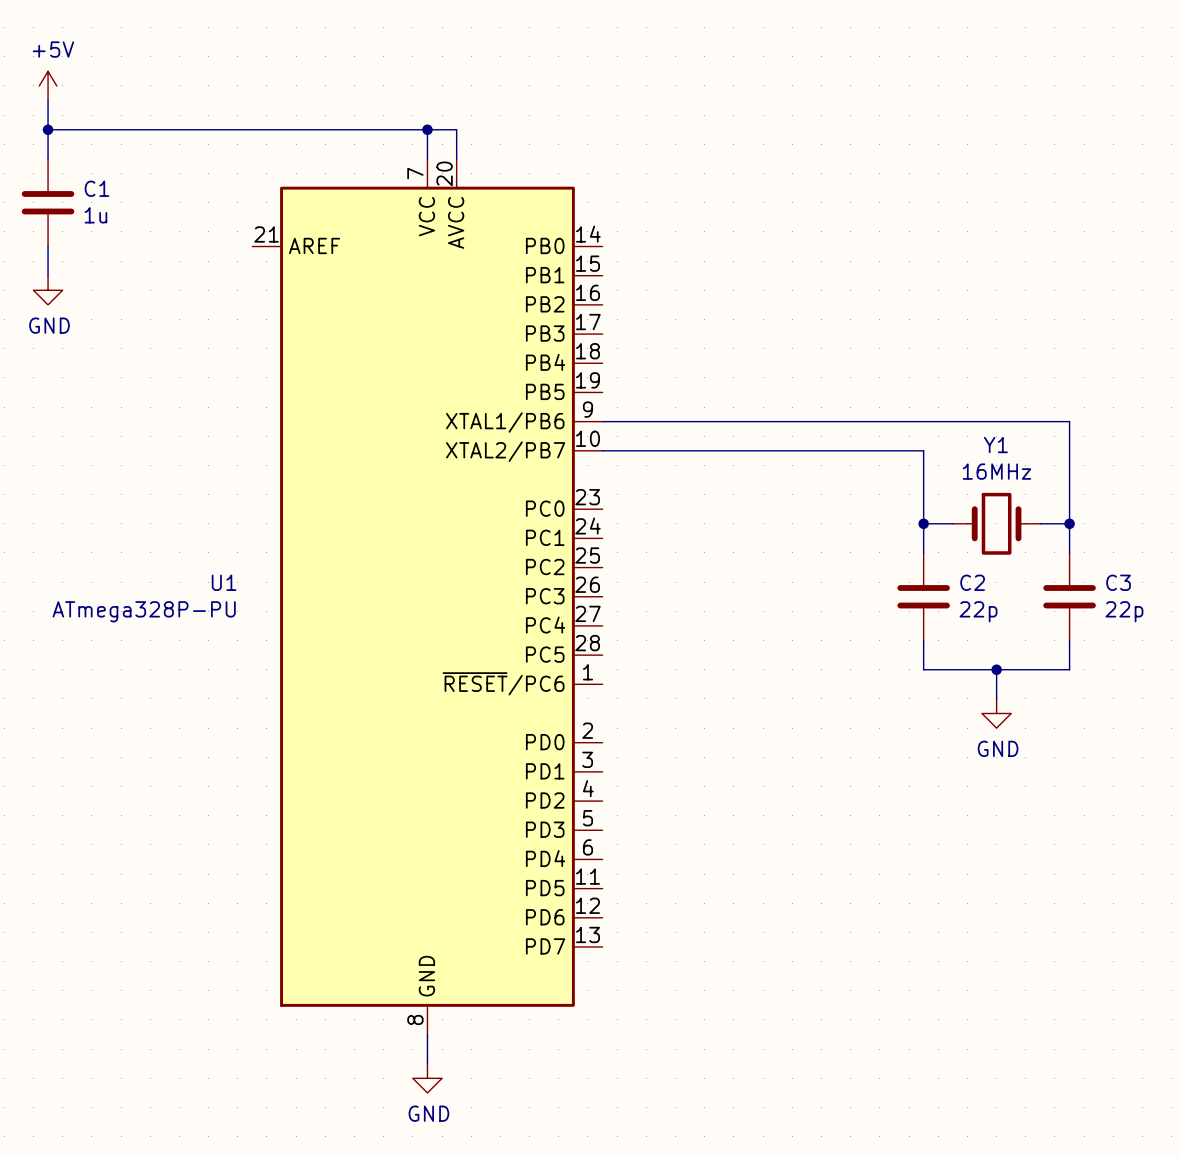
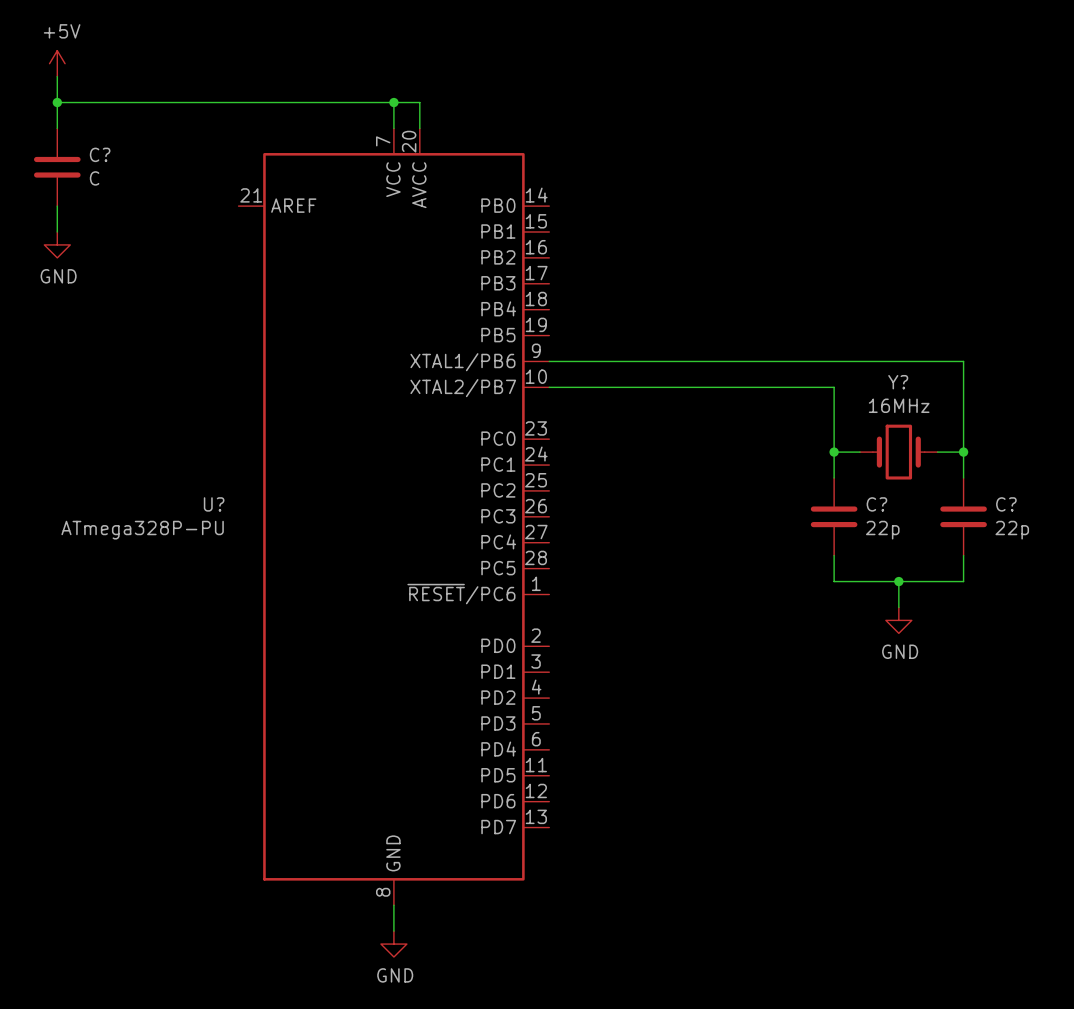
C1 name: C1 (97, 188) -> C? (100, 154)
C1 value: 1u (95, 215) -> C (94, 178)
Y1 name: Y1 (995, 445) -> Y? (898, 382)
U1 name: U1 (224, 582) -> U? (214, 504)
C2 name: C2 (972, 582) -> C? (876, 504)
C3 name: C3 (1118, 582) -> C? (1006, 504)

